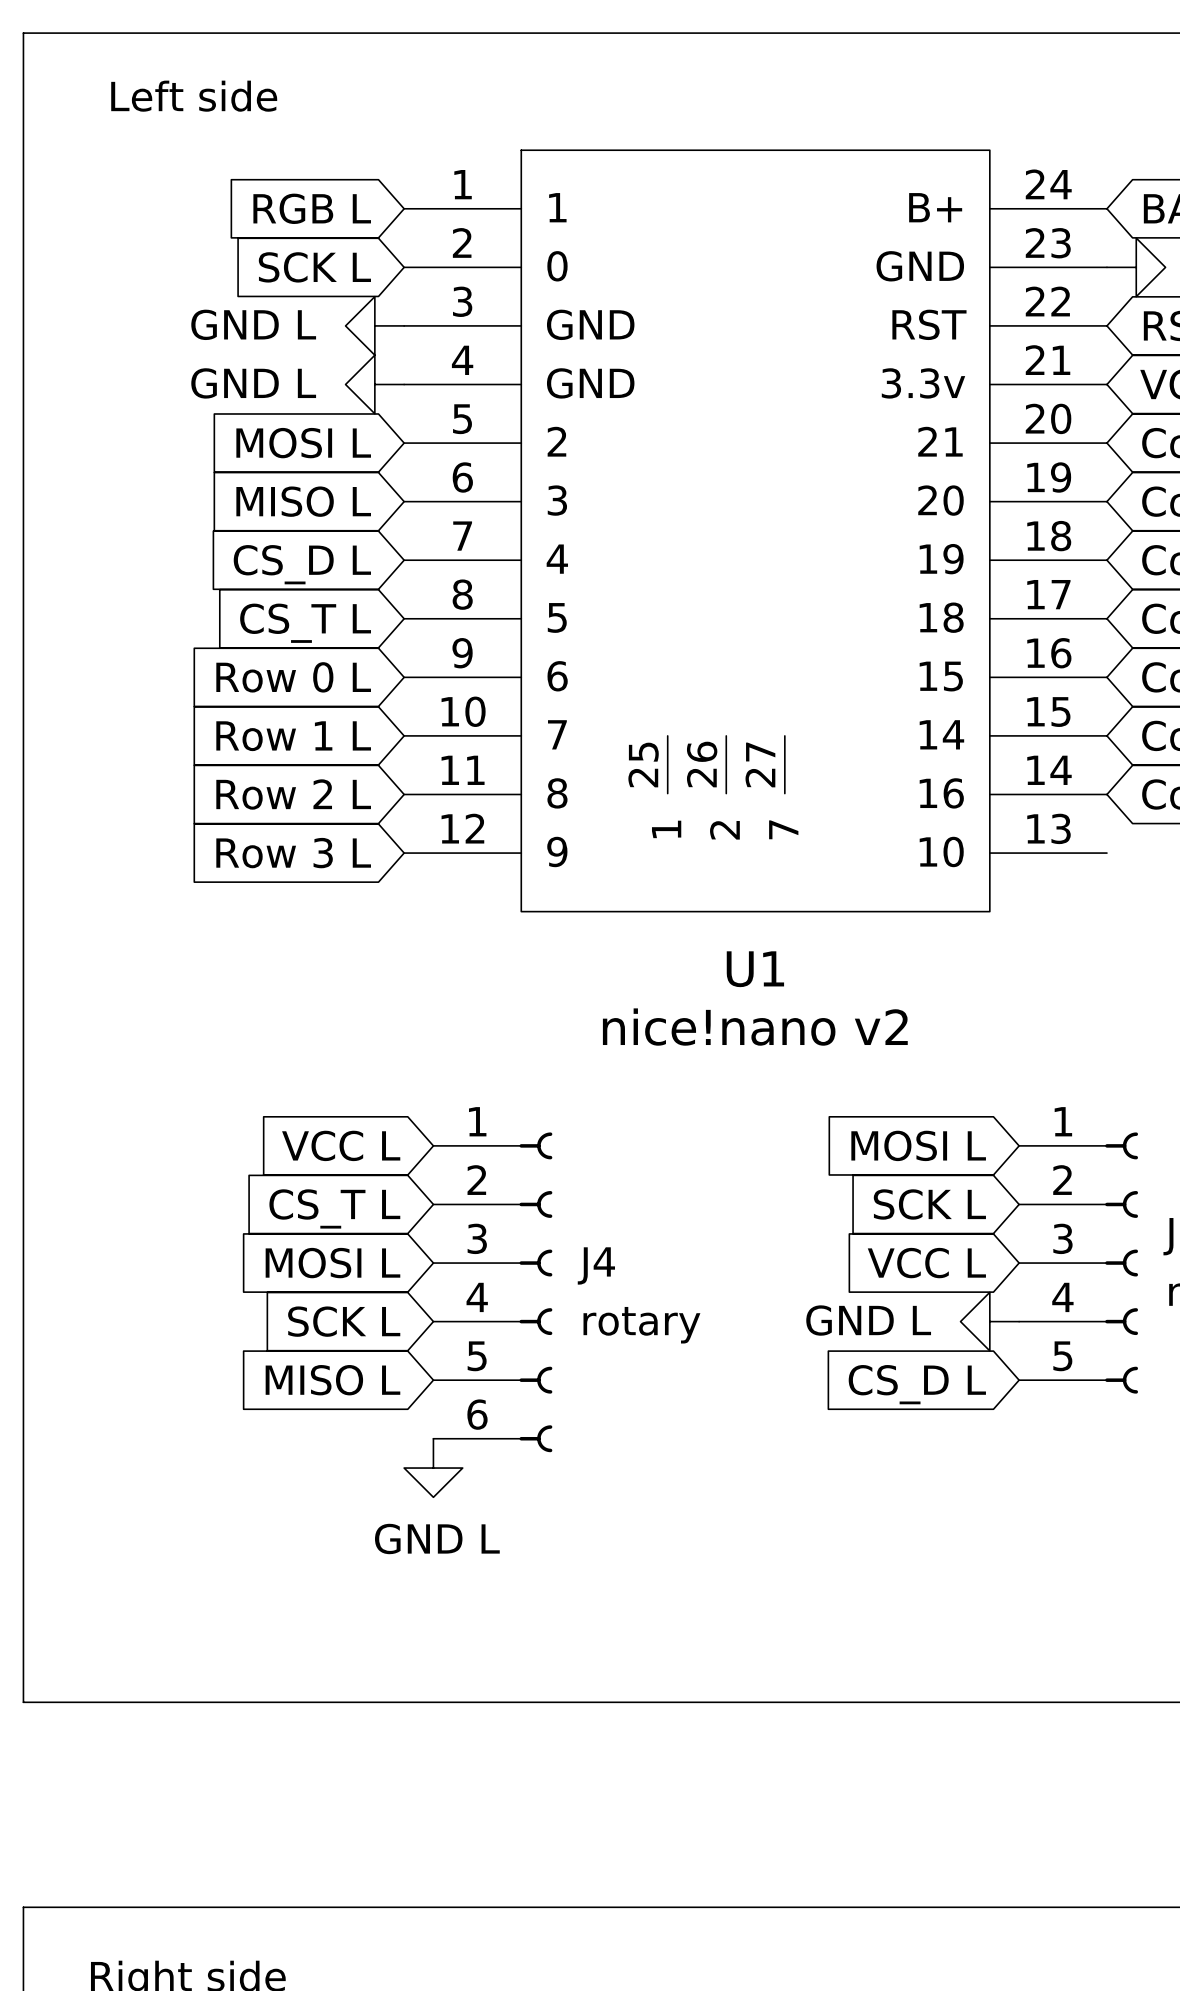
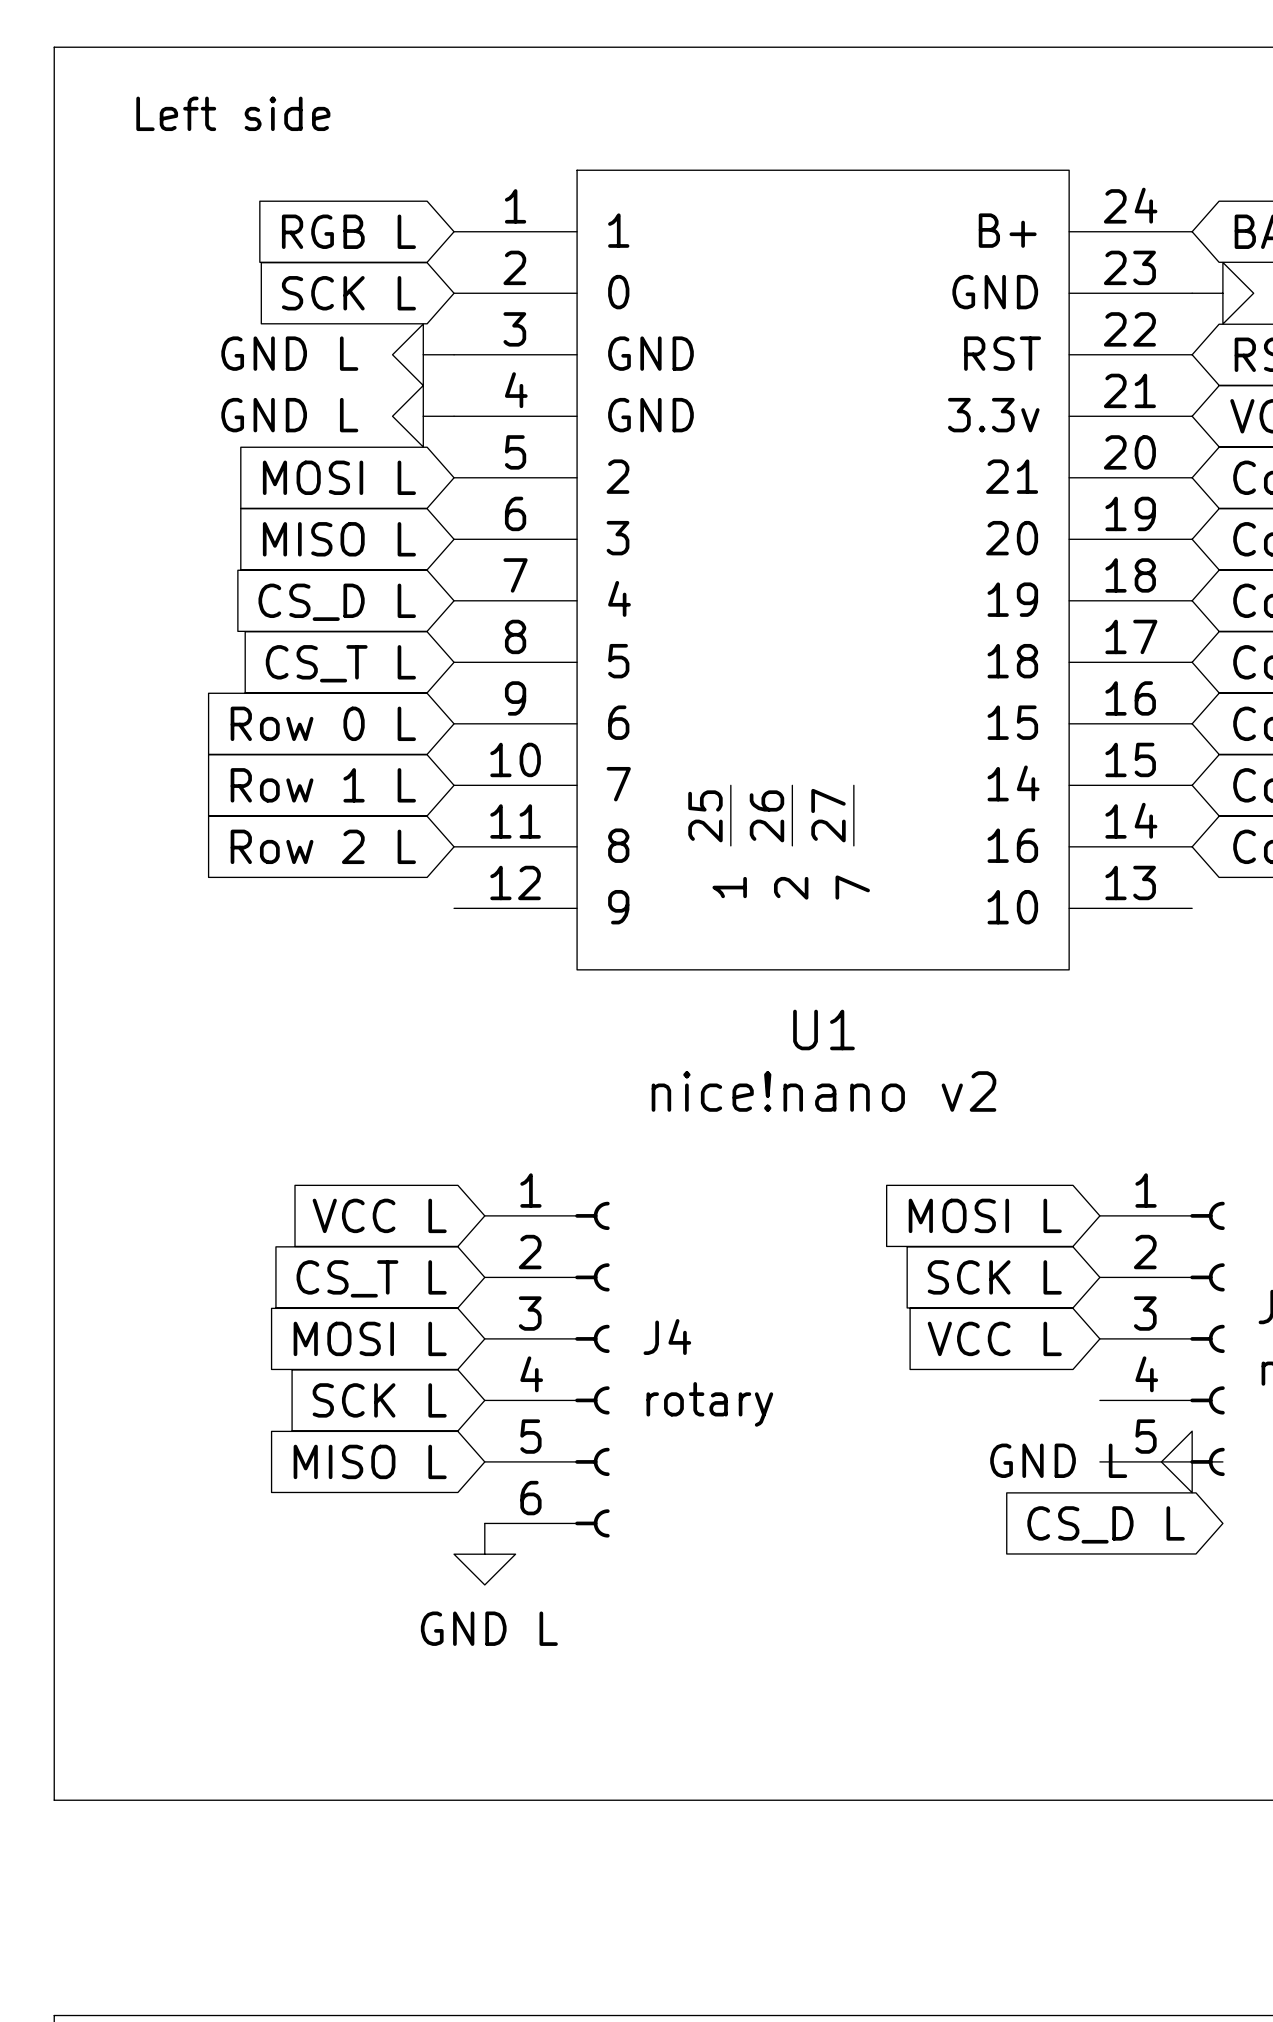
global label: Row 3 L (293, 853) -> none
power symbol position: GND L (989, 1321) -> GND L (1192, 1461)
global label position: CS_D L (917, 1384) -> CS_D L (1106, 1524)

